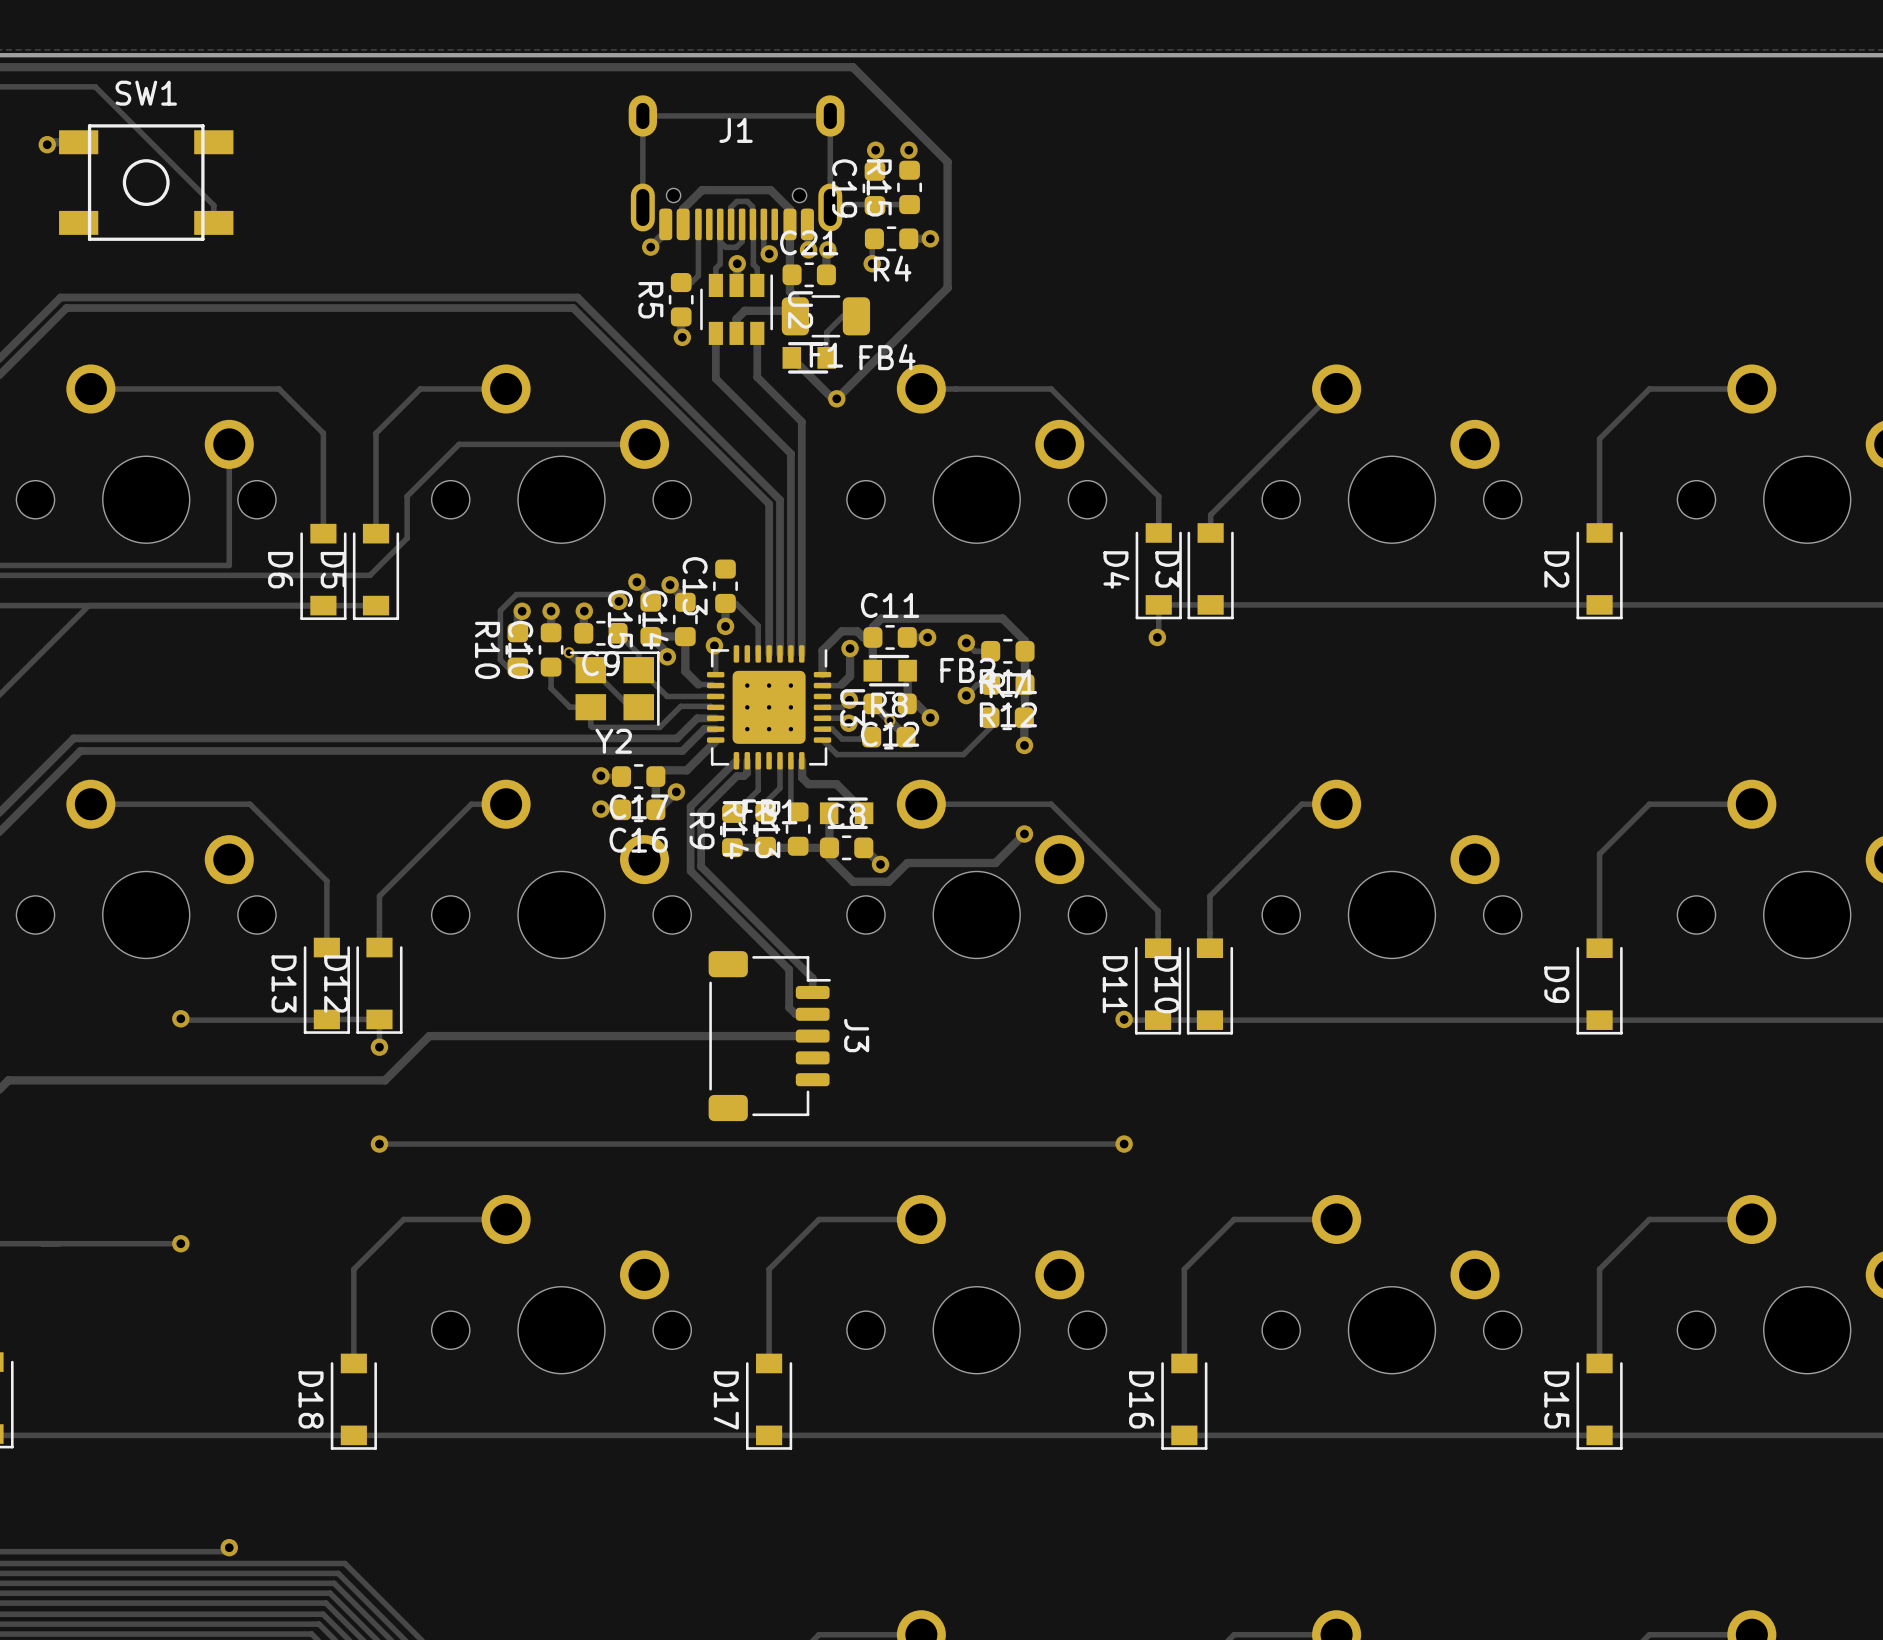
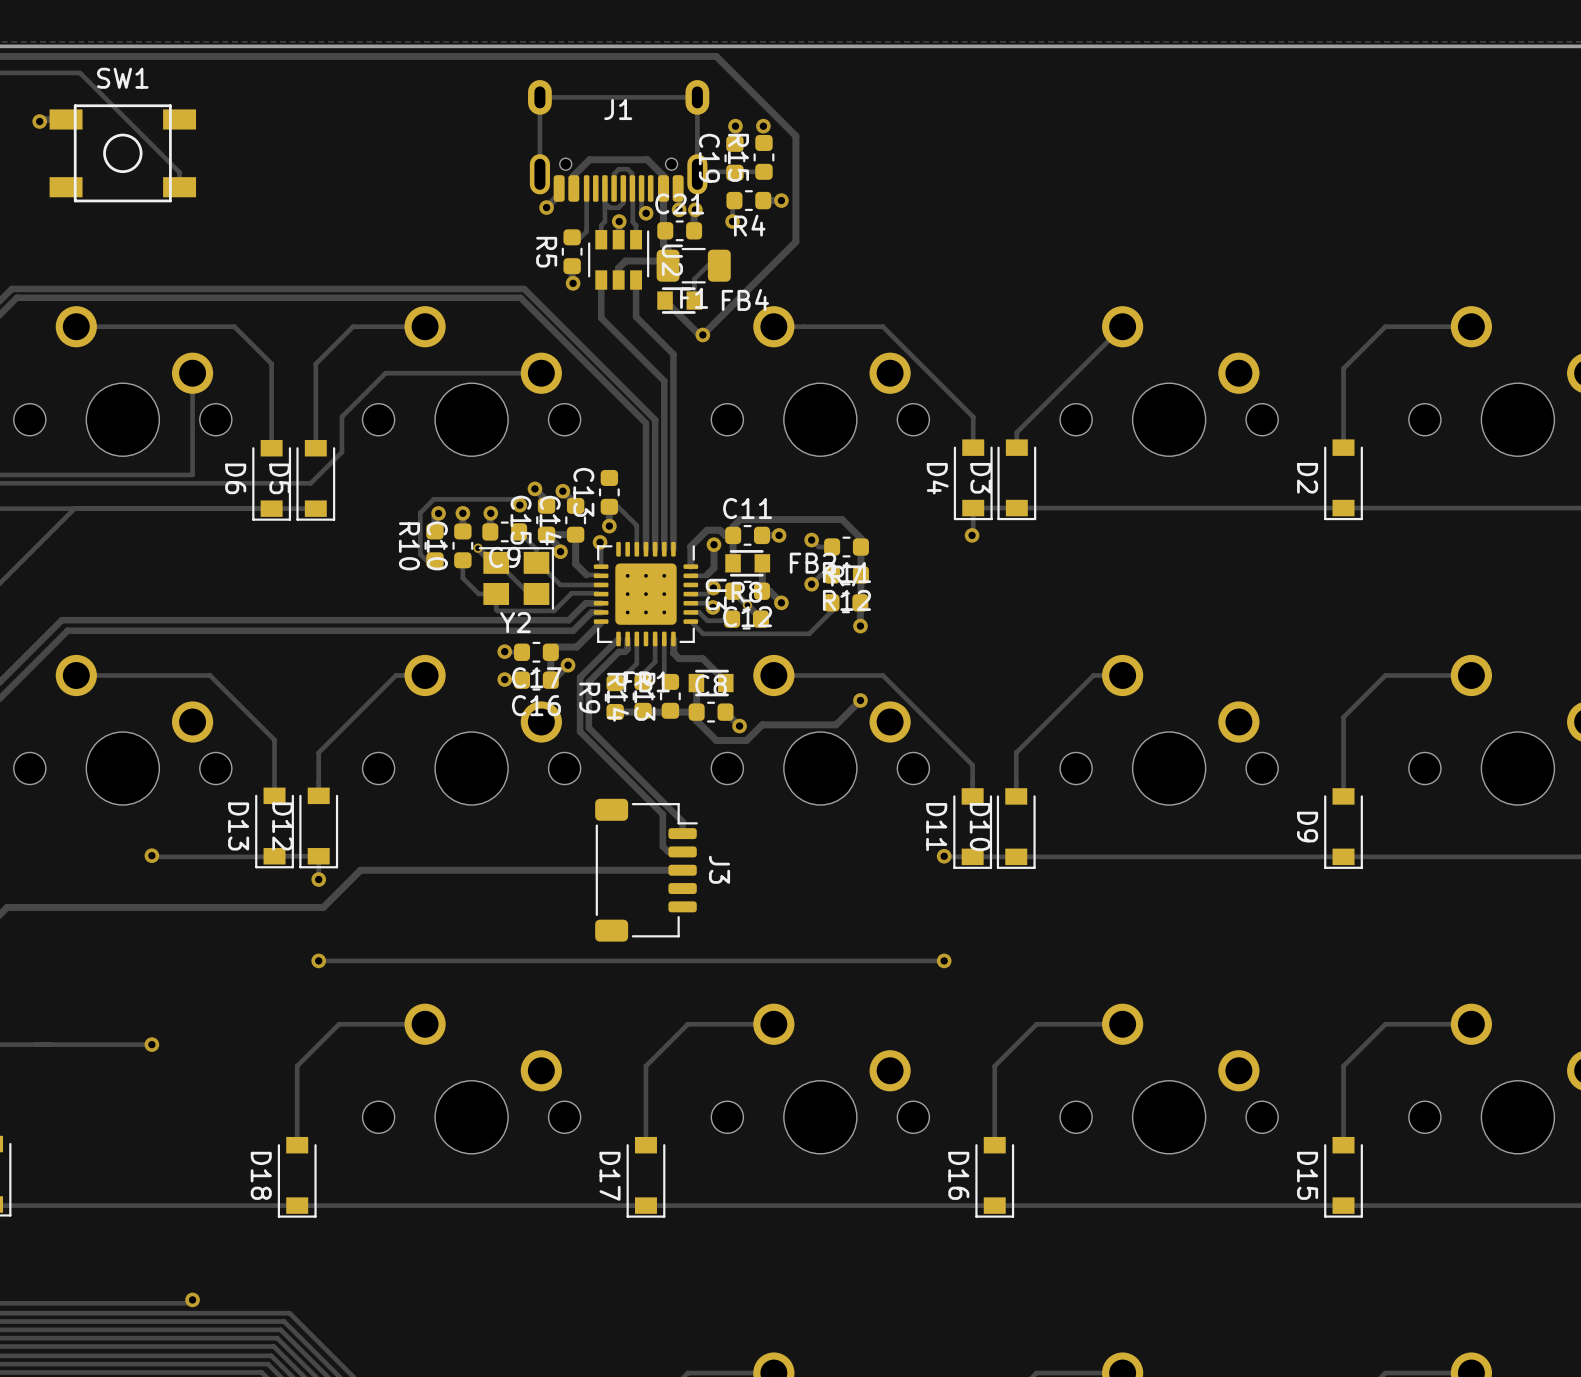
track: (624, 344) (577, 297) (60, 297) (14, 344) -> (524, 288) (11, 288)
track: (619, 354) (573, 308) (66, 308) (20, 354) -> (520, 297) (16, 297)

